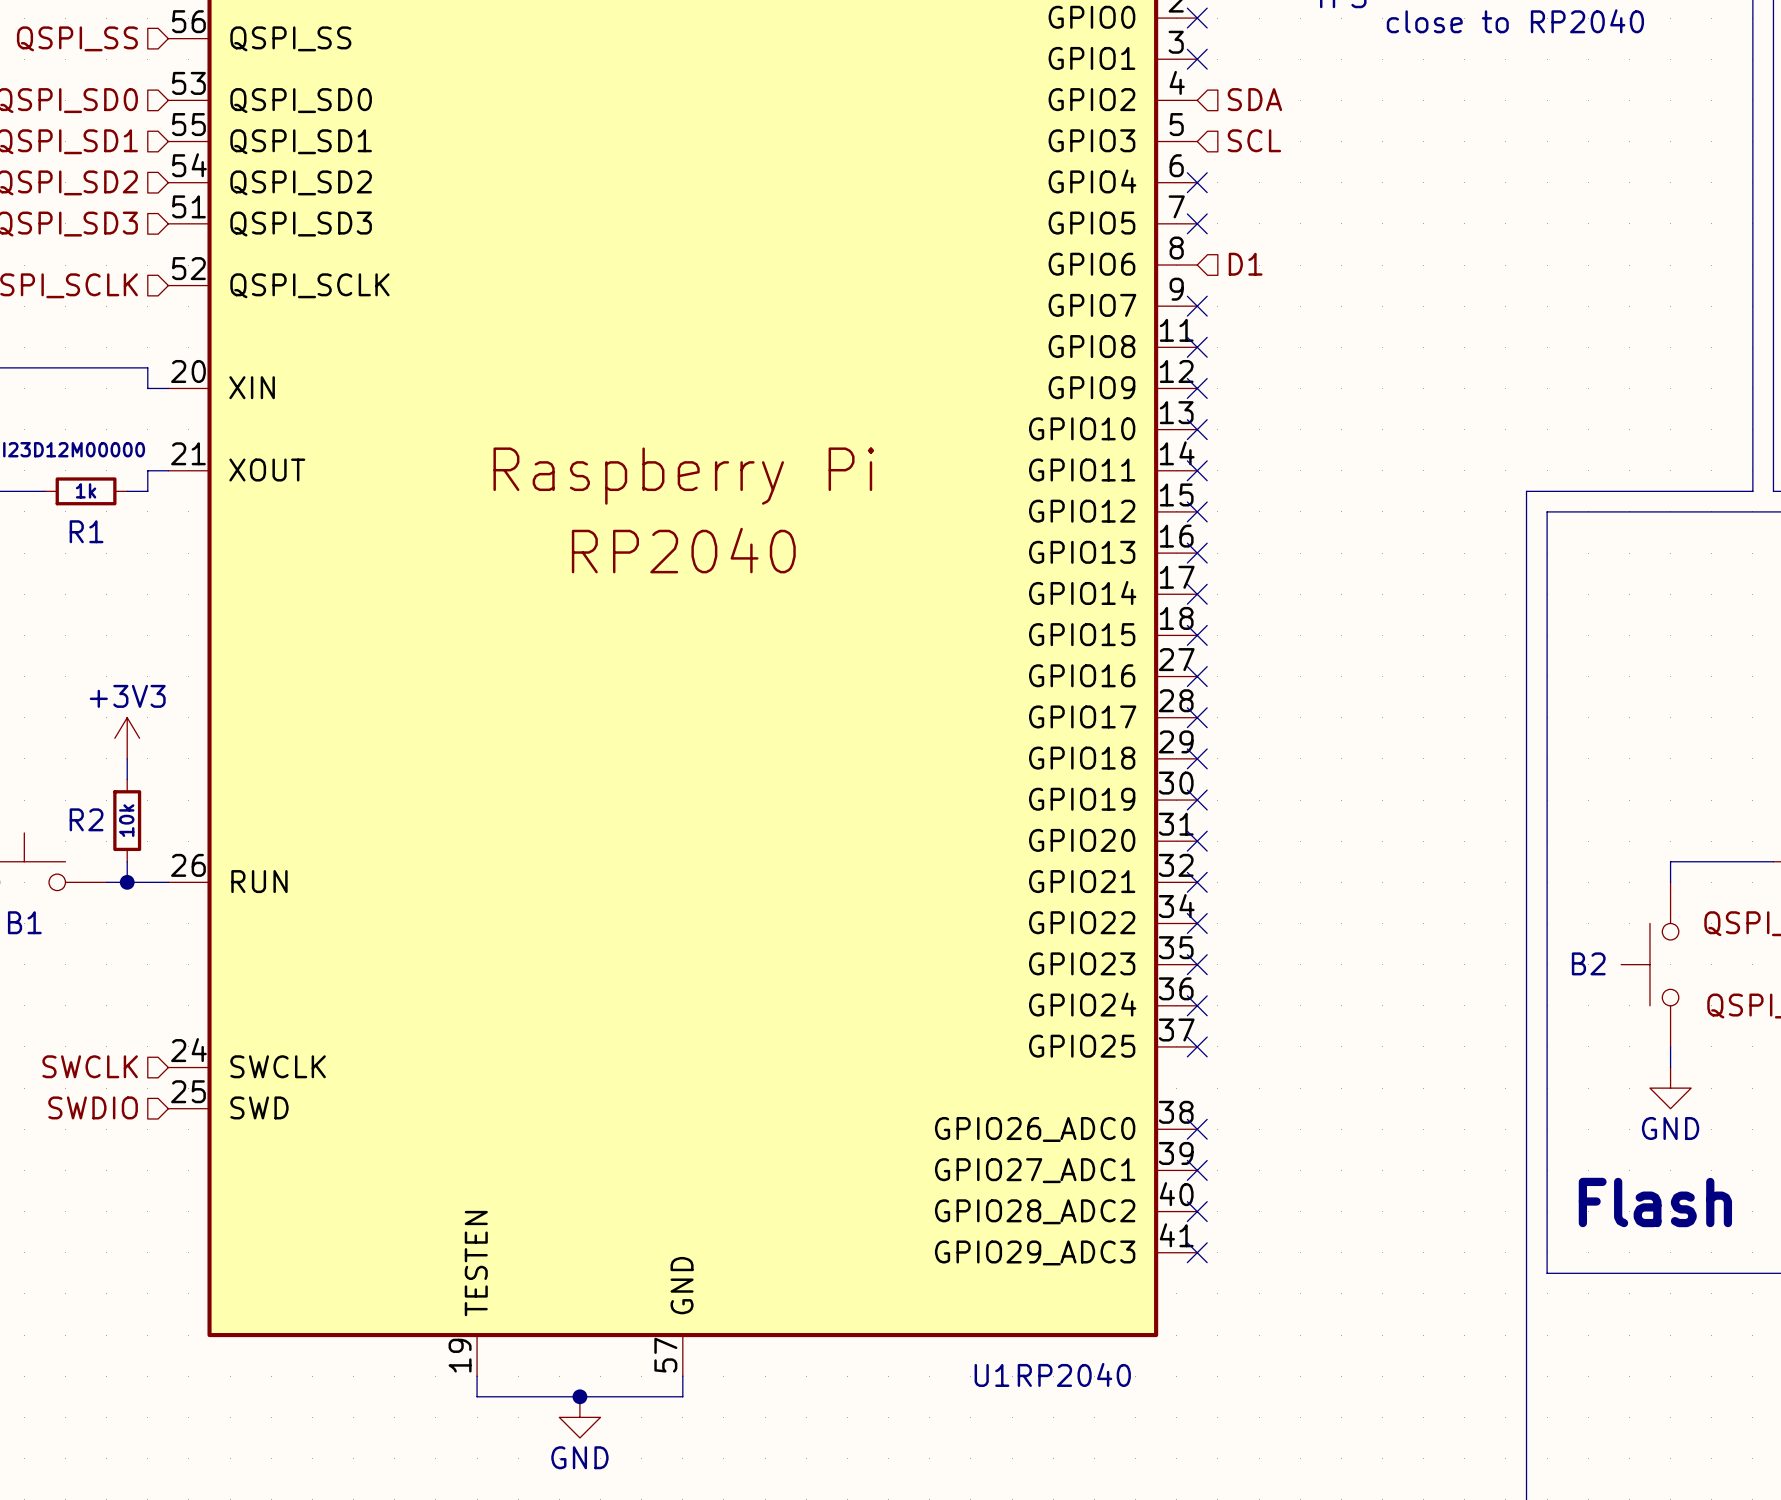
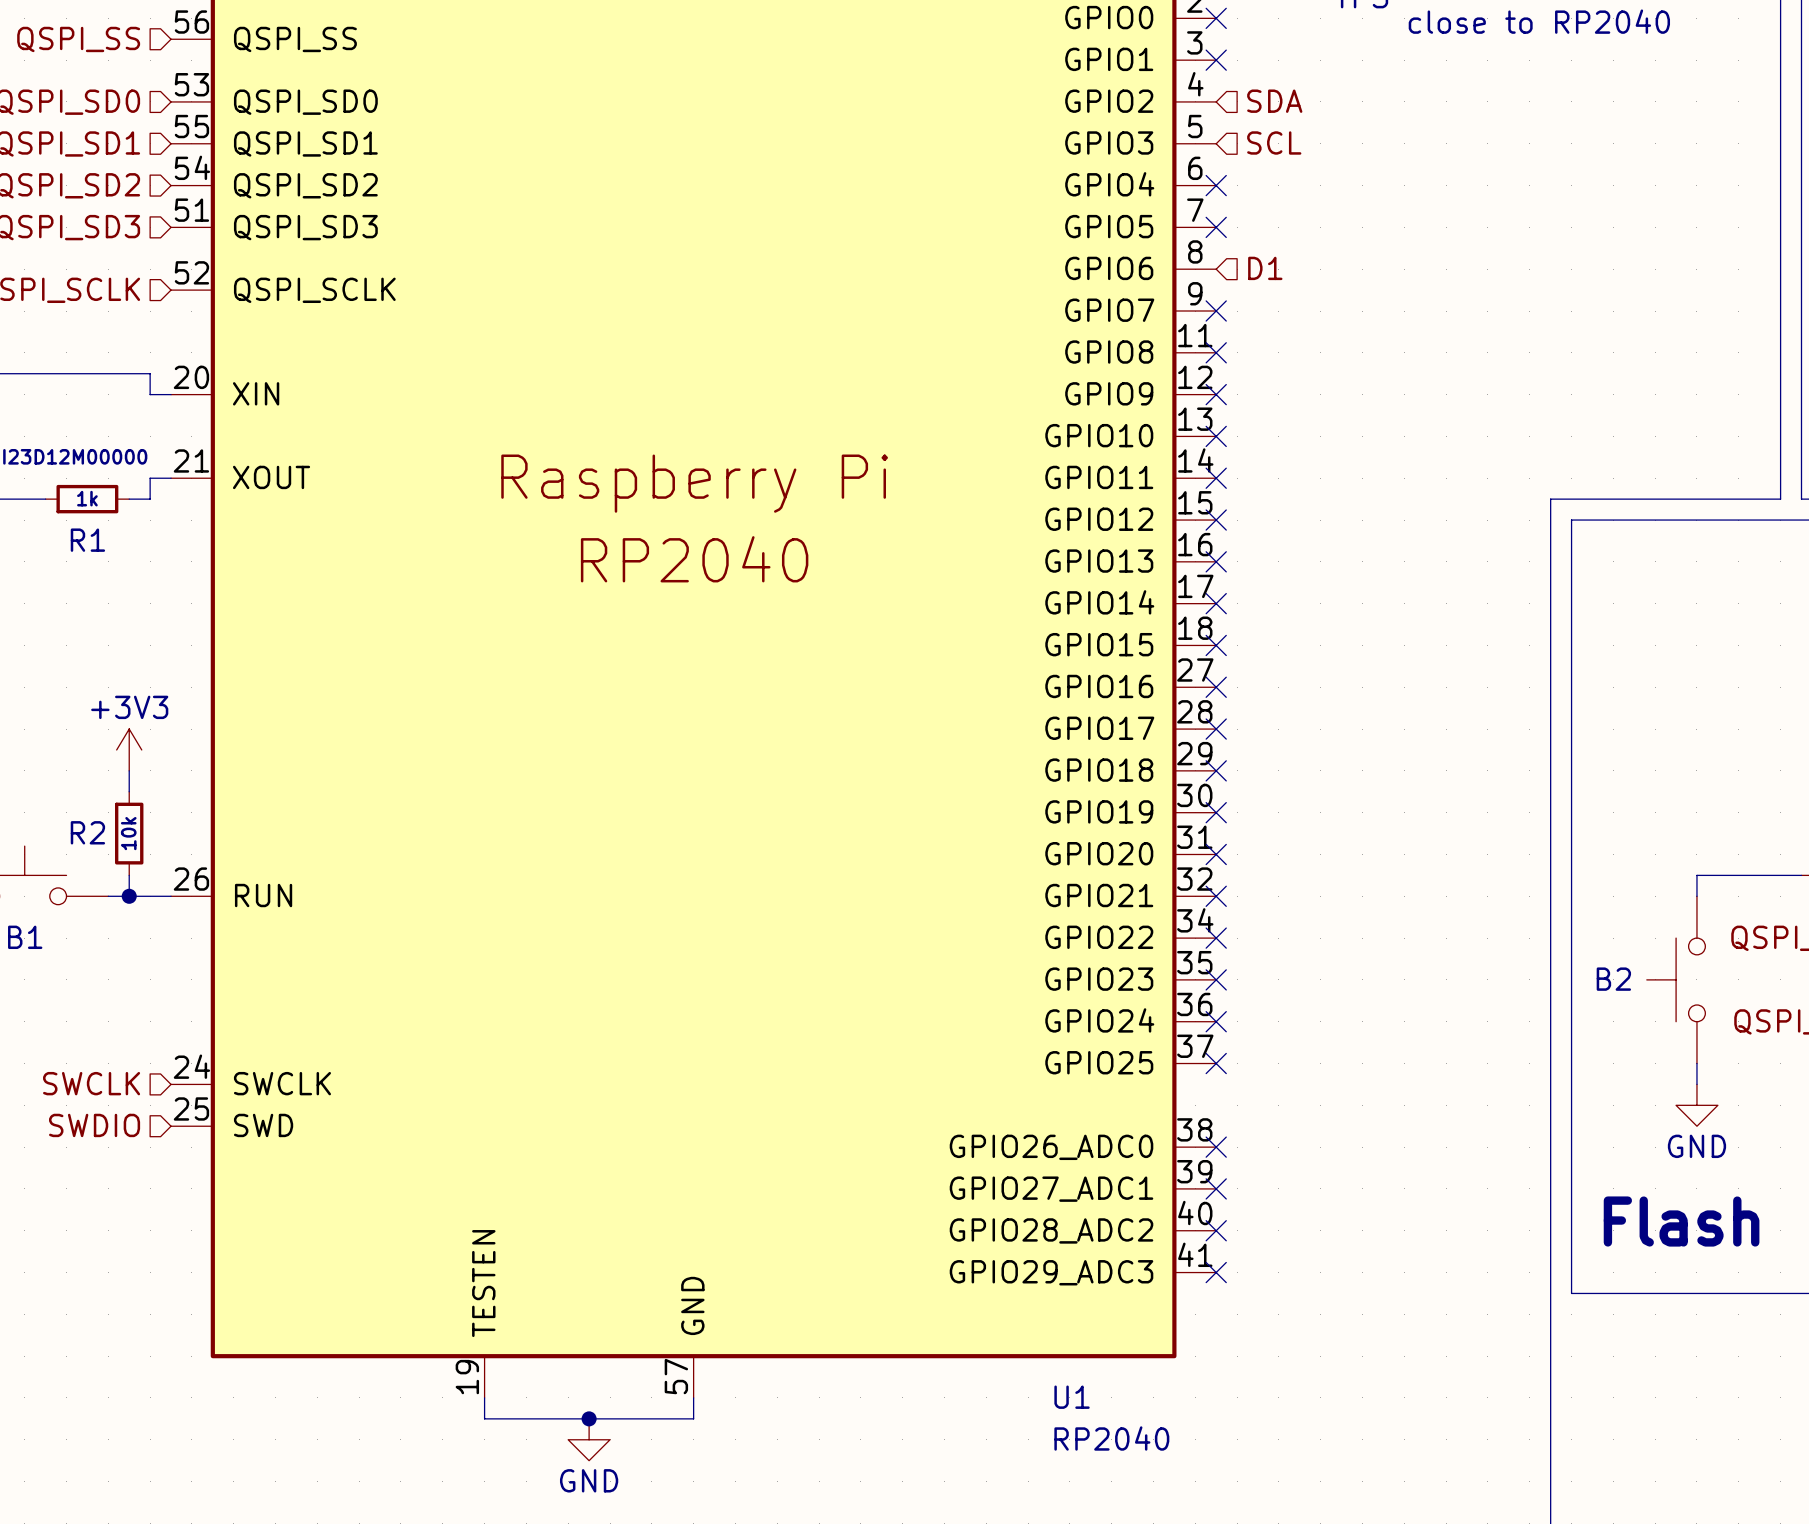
U1 value position: RP2040 (1074, 1374) -> RP2040 (1111, 1438)
U1 name position: U1 (991, 1375) -> U1 (1072, 1397)

